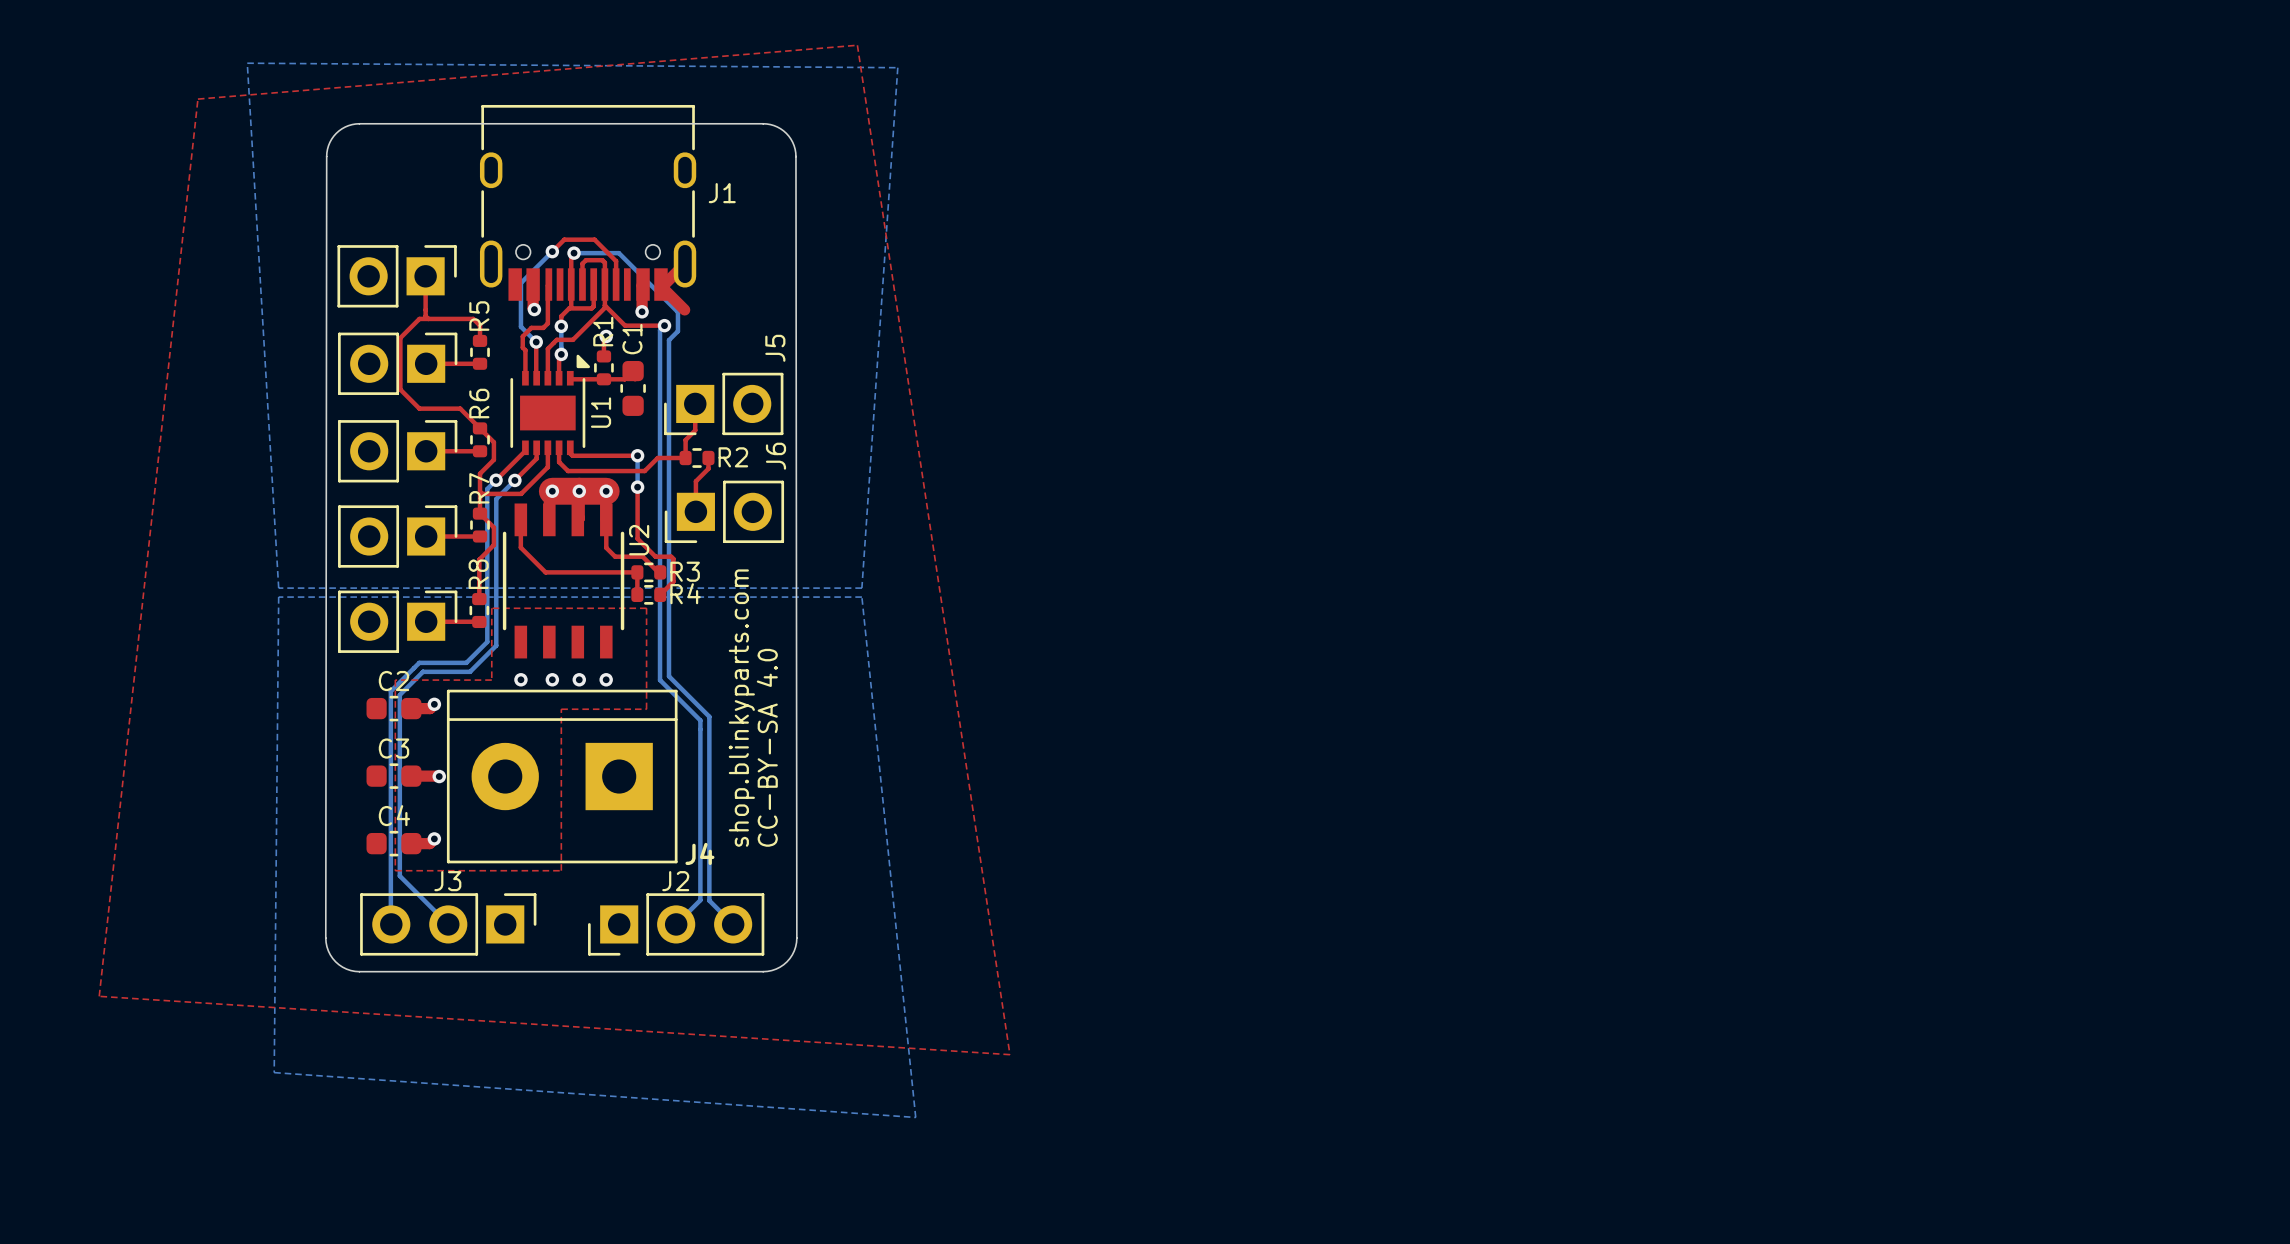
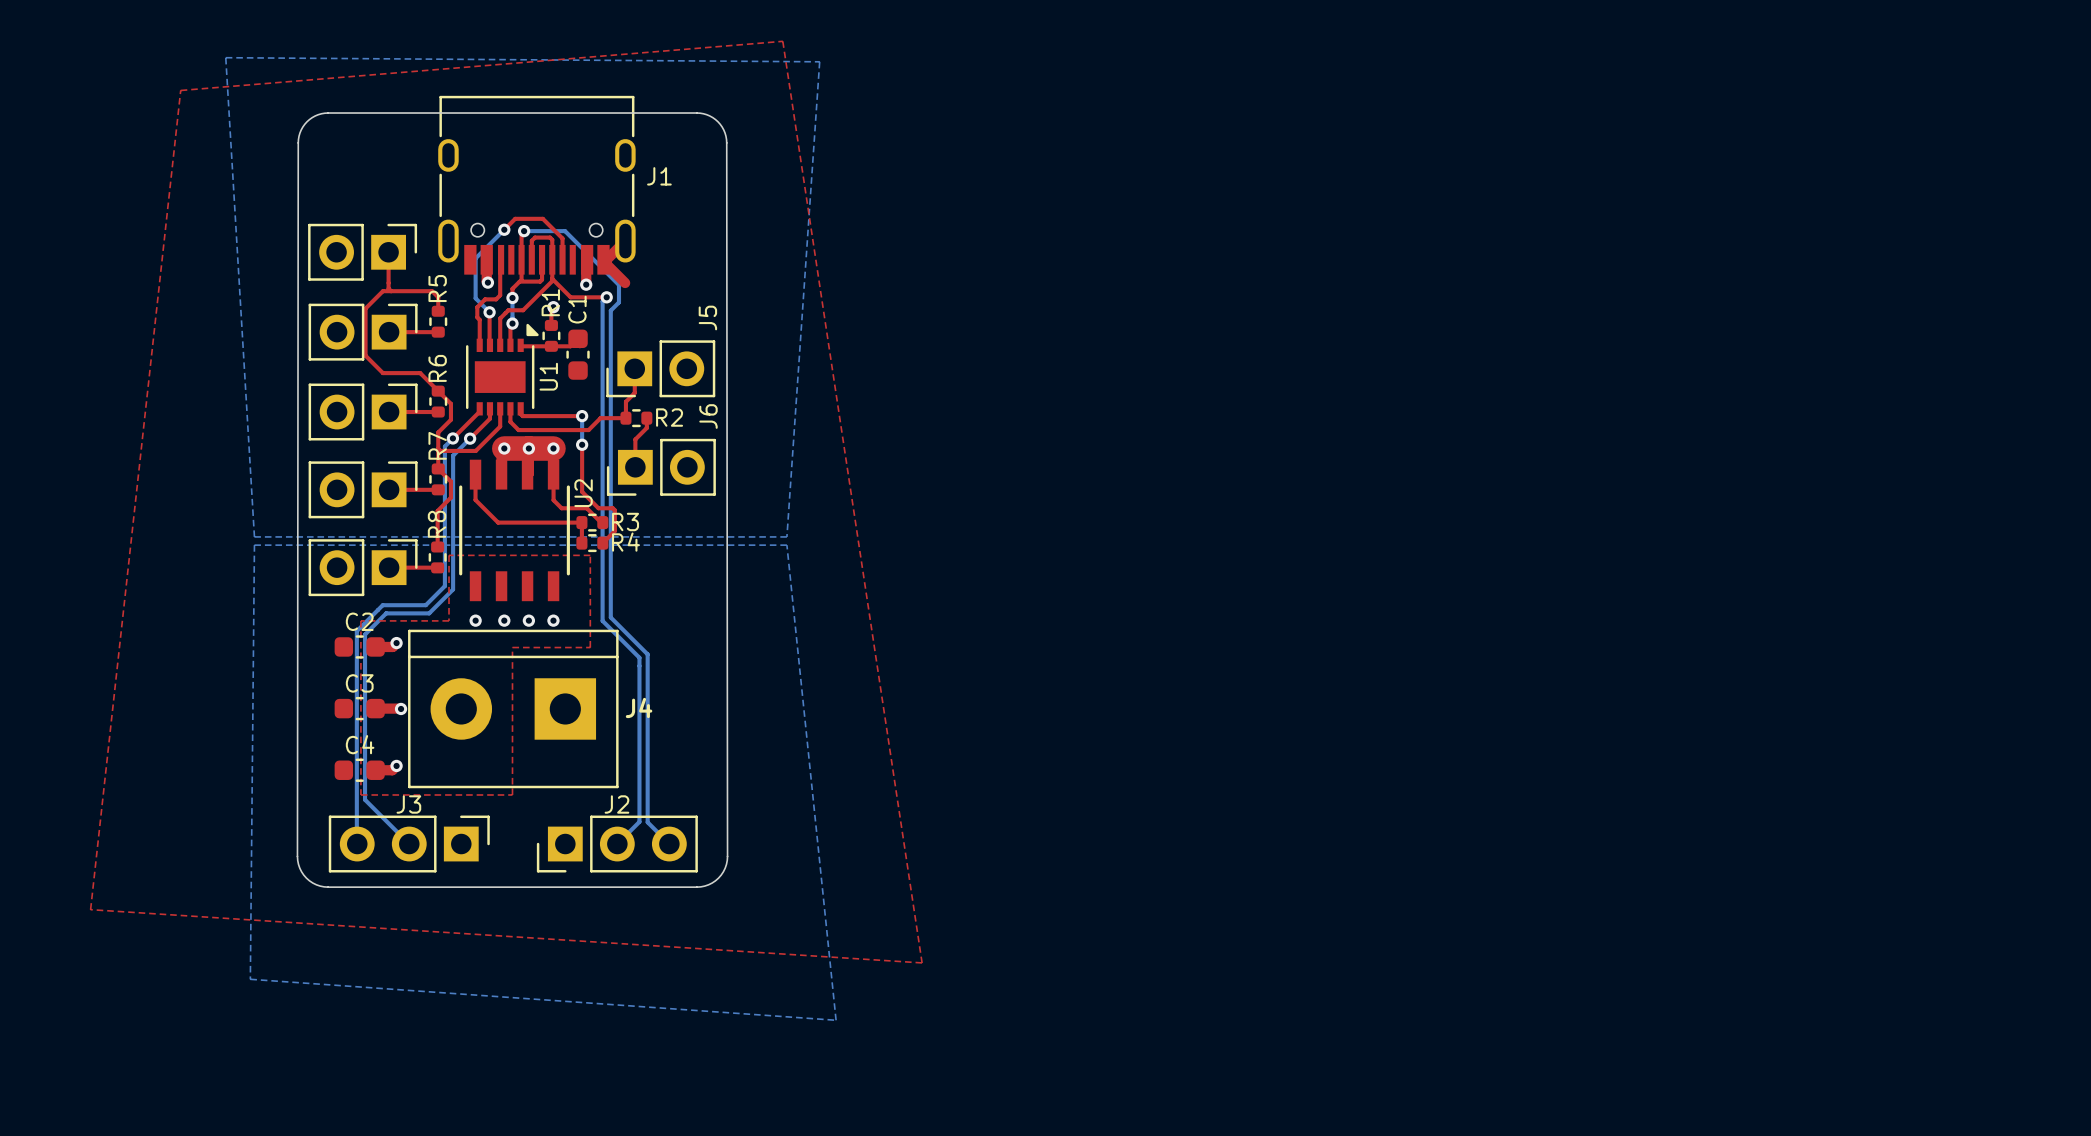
text: shop.blinkyparts.com (741, 708) -> none
text: CC-BY-SA 4.0 (767, 747) -> none
J4 name position: J4 (699, 853) -> J4 (639, 707)

